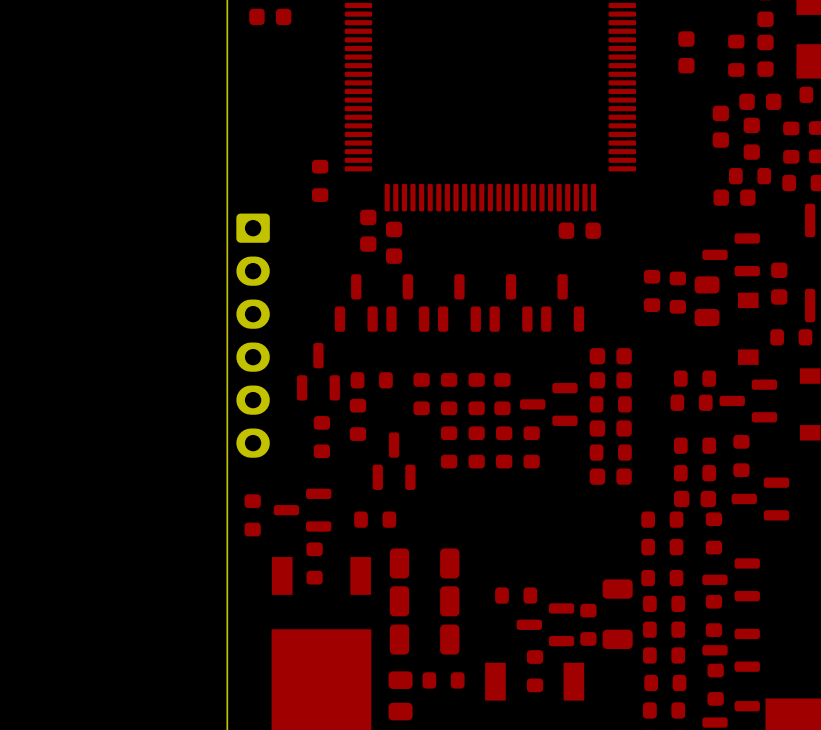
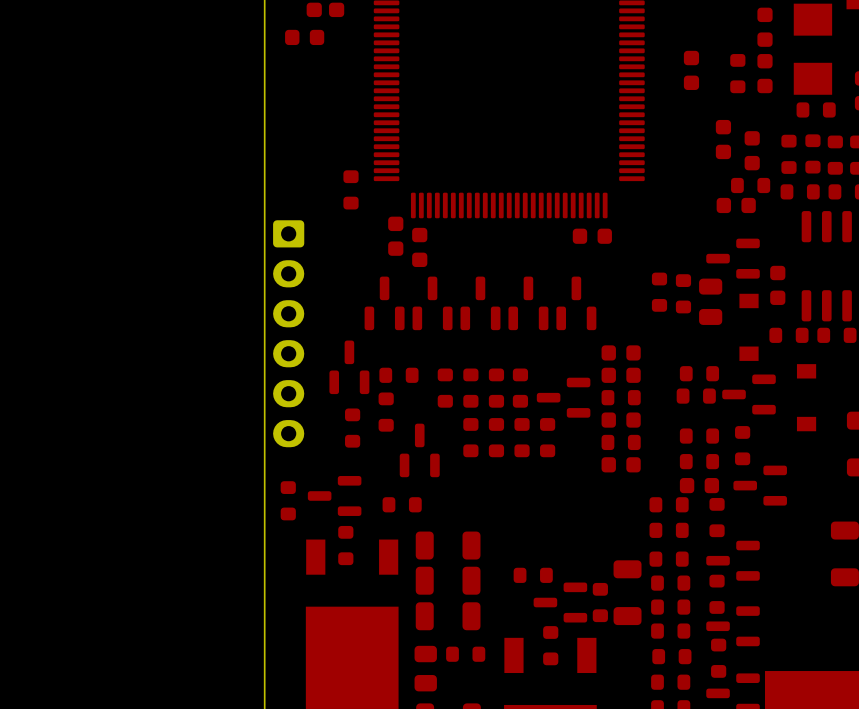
part: (760, 101) -> none

